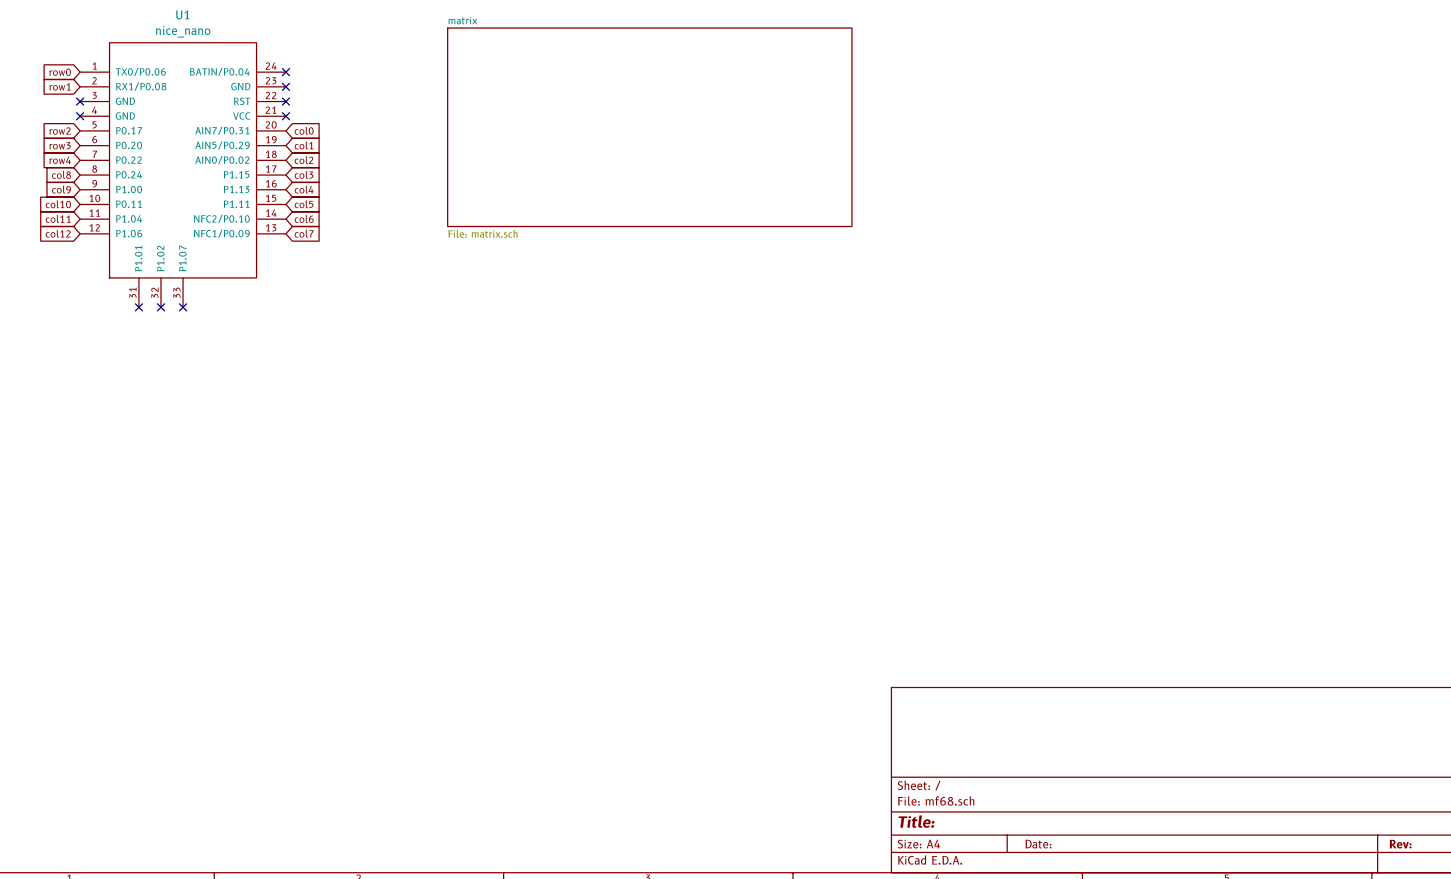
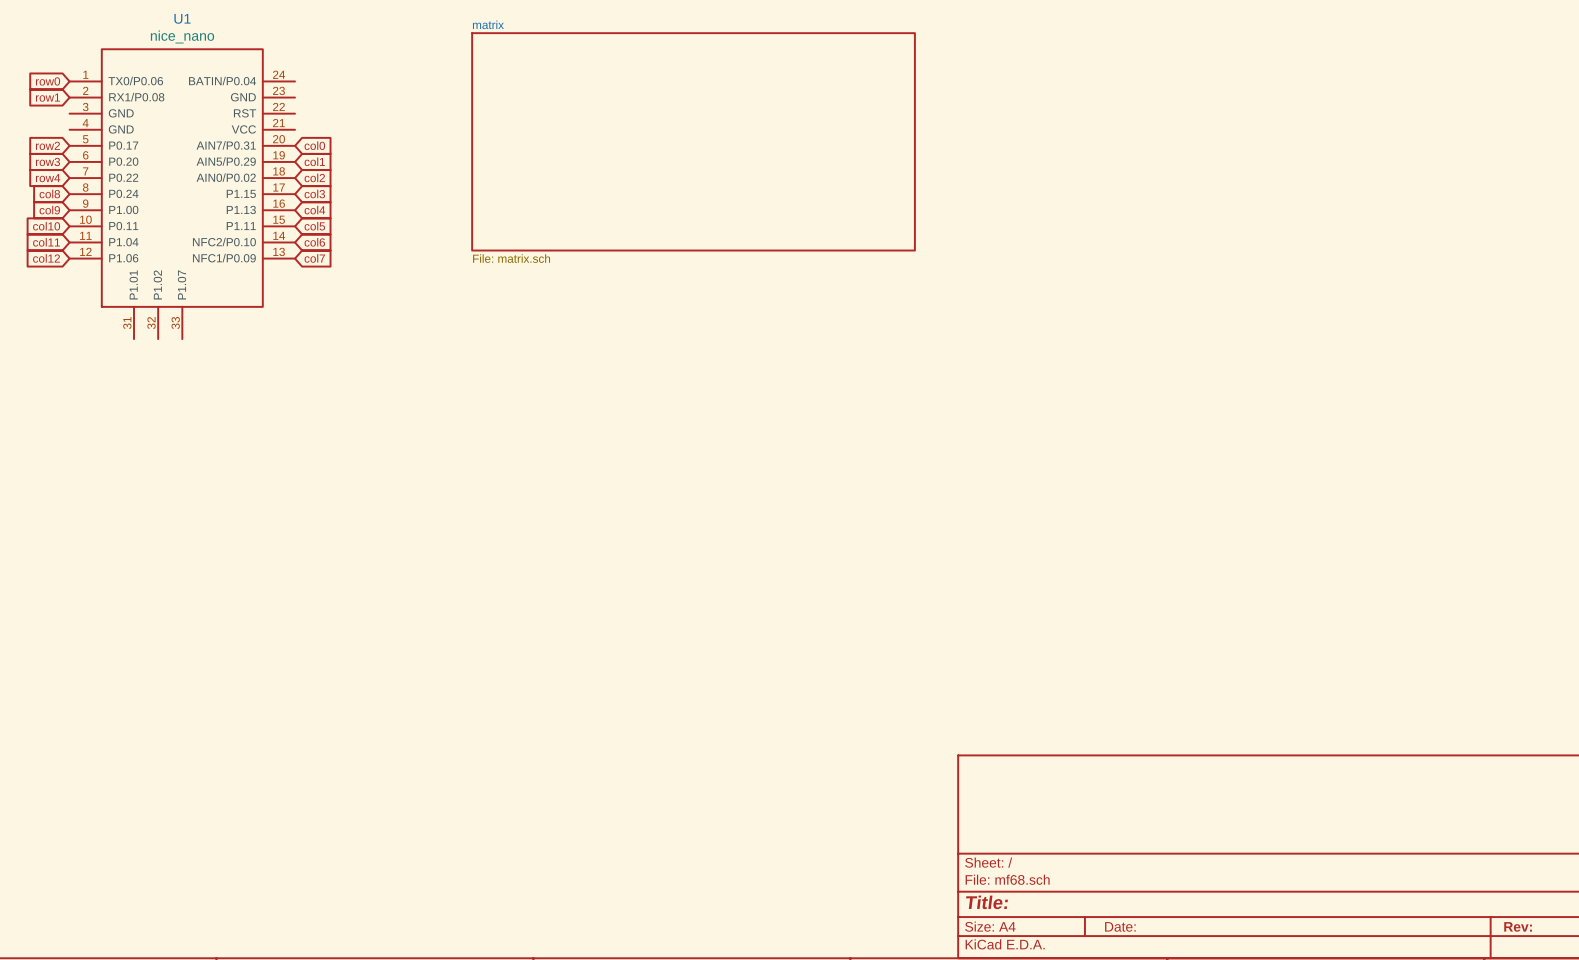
no-connect mark: (285, 72) -> none
no-connect mark: (285, 86) -> none
no-connect mark: (80, 101) -> none
no-connect mark: (285, 101) -> none
no-connect mark: (80, 116) -> none
no-connect mark: (285, 116) -> none
no-connect mark: (138, 307) -> none
no-connect mark: (160, 307) -> none
no-connect mark: (183, 307) -> none

